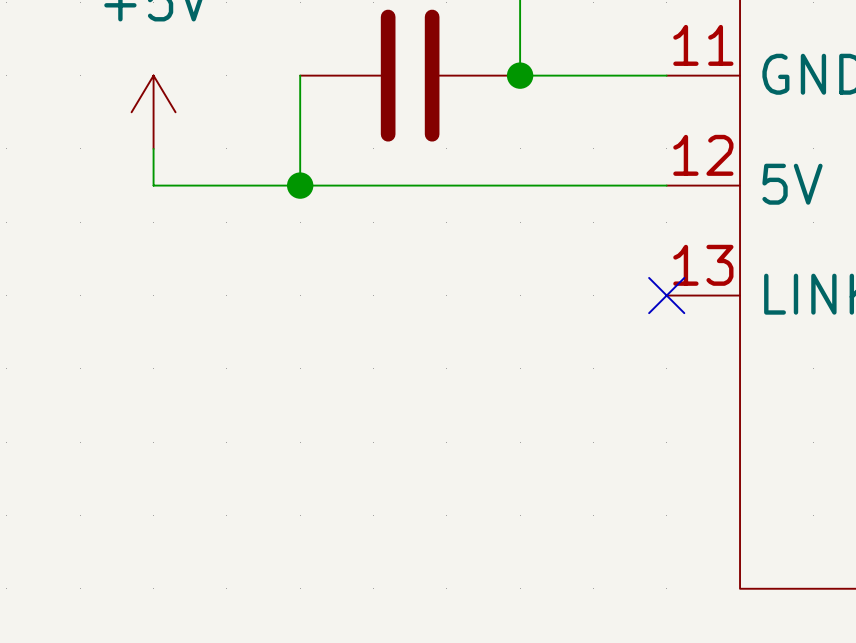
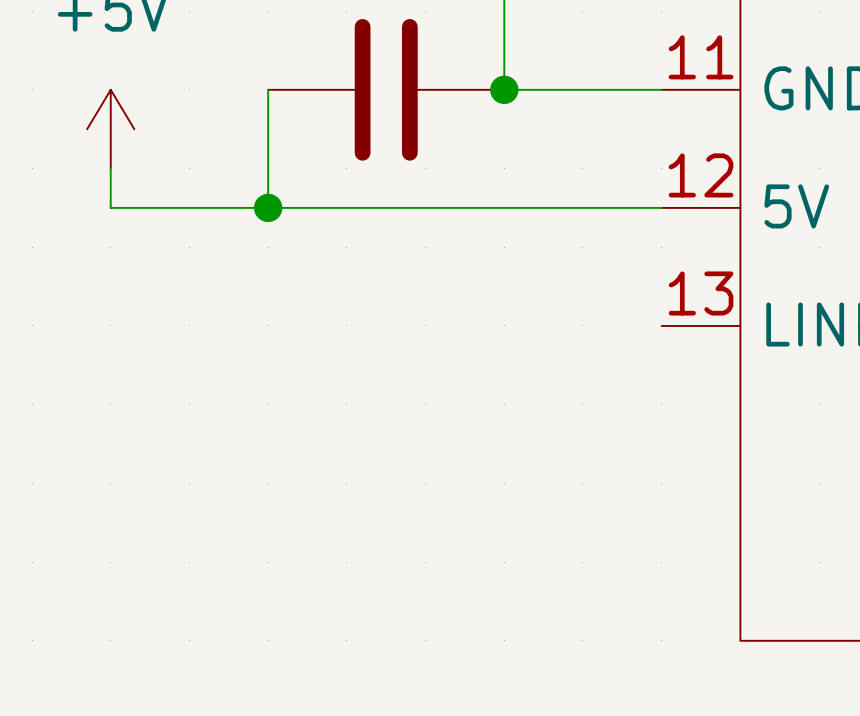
no-connect mark: (666, 295) -> none

